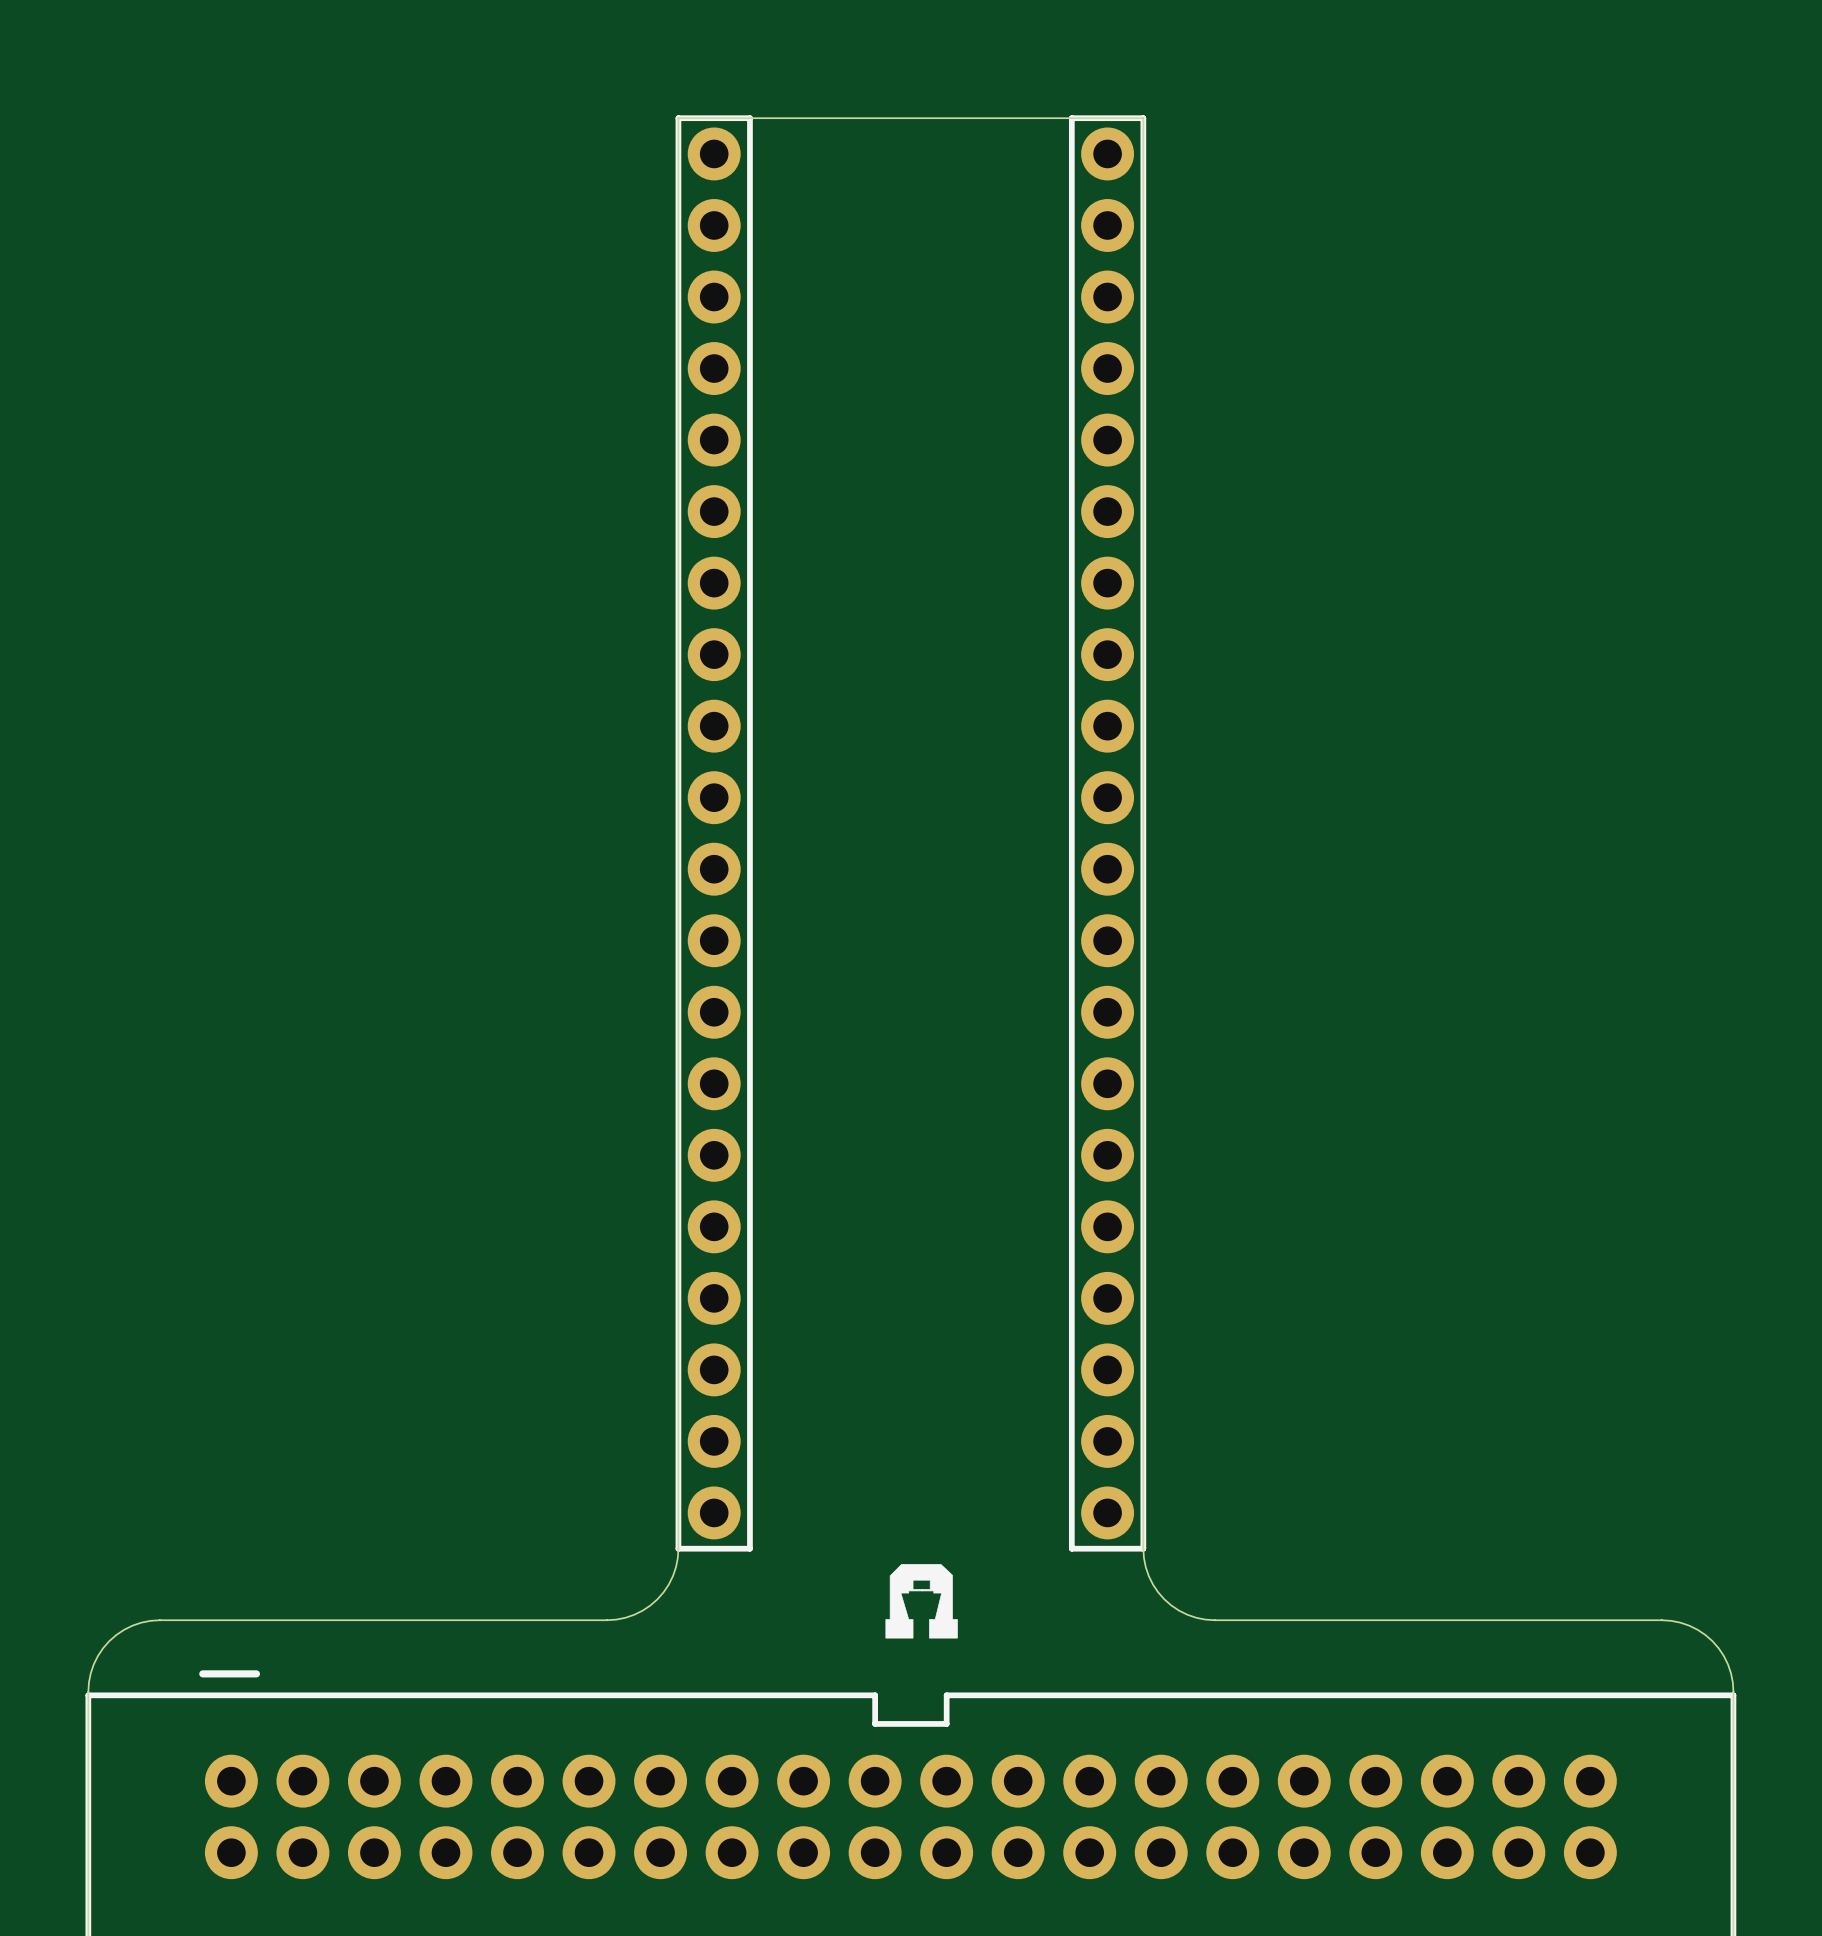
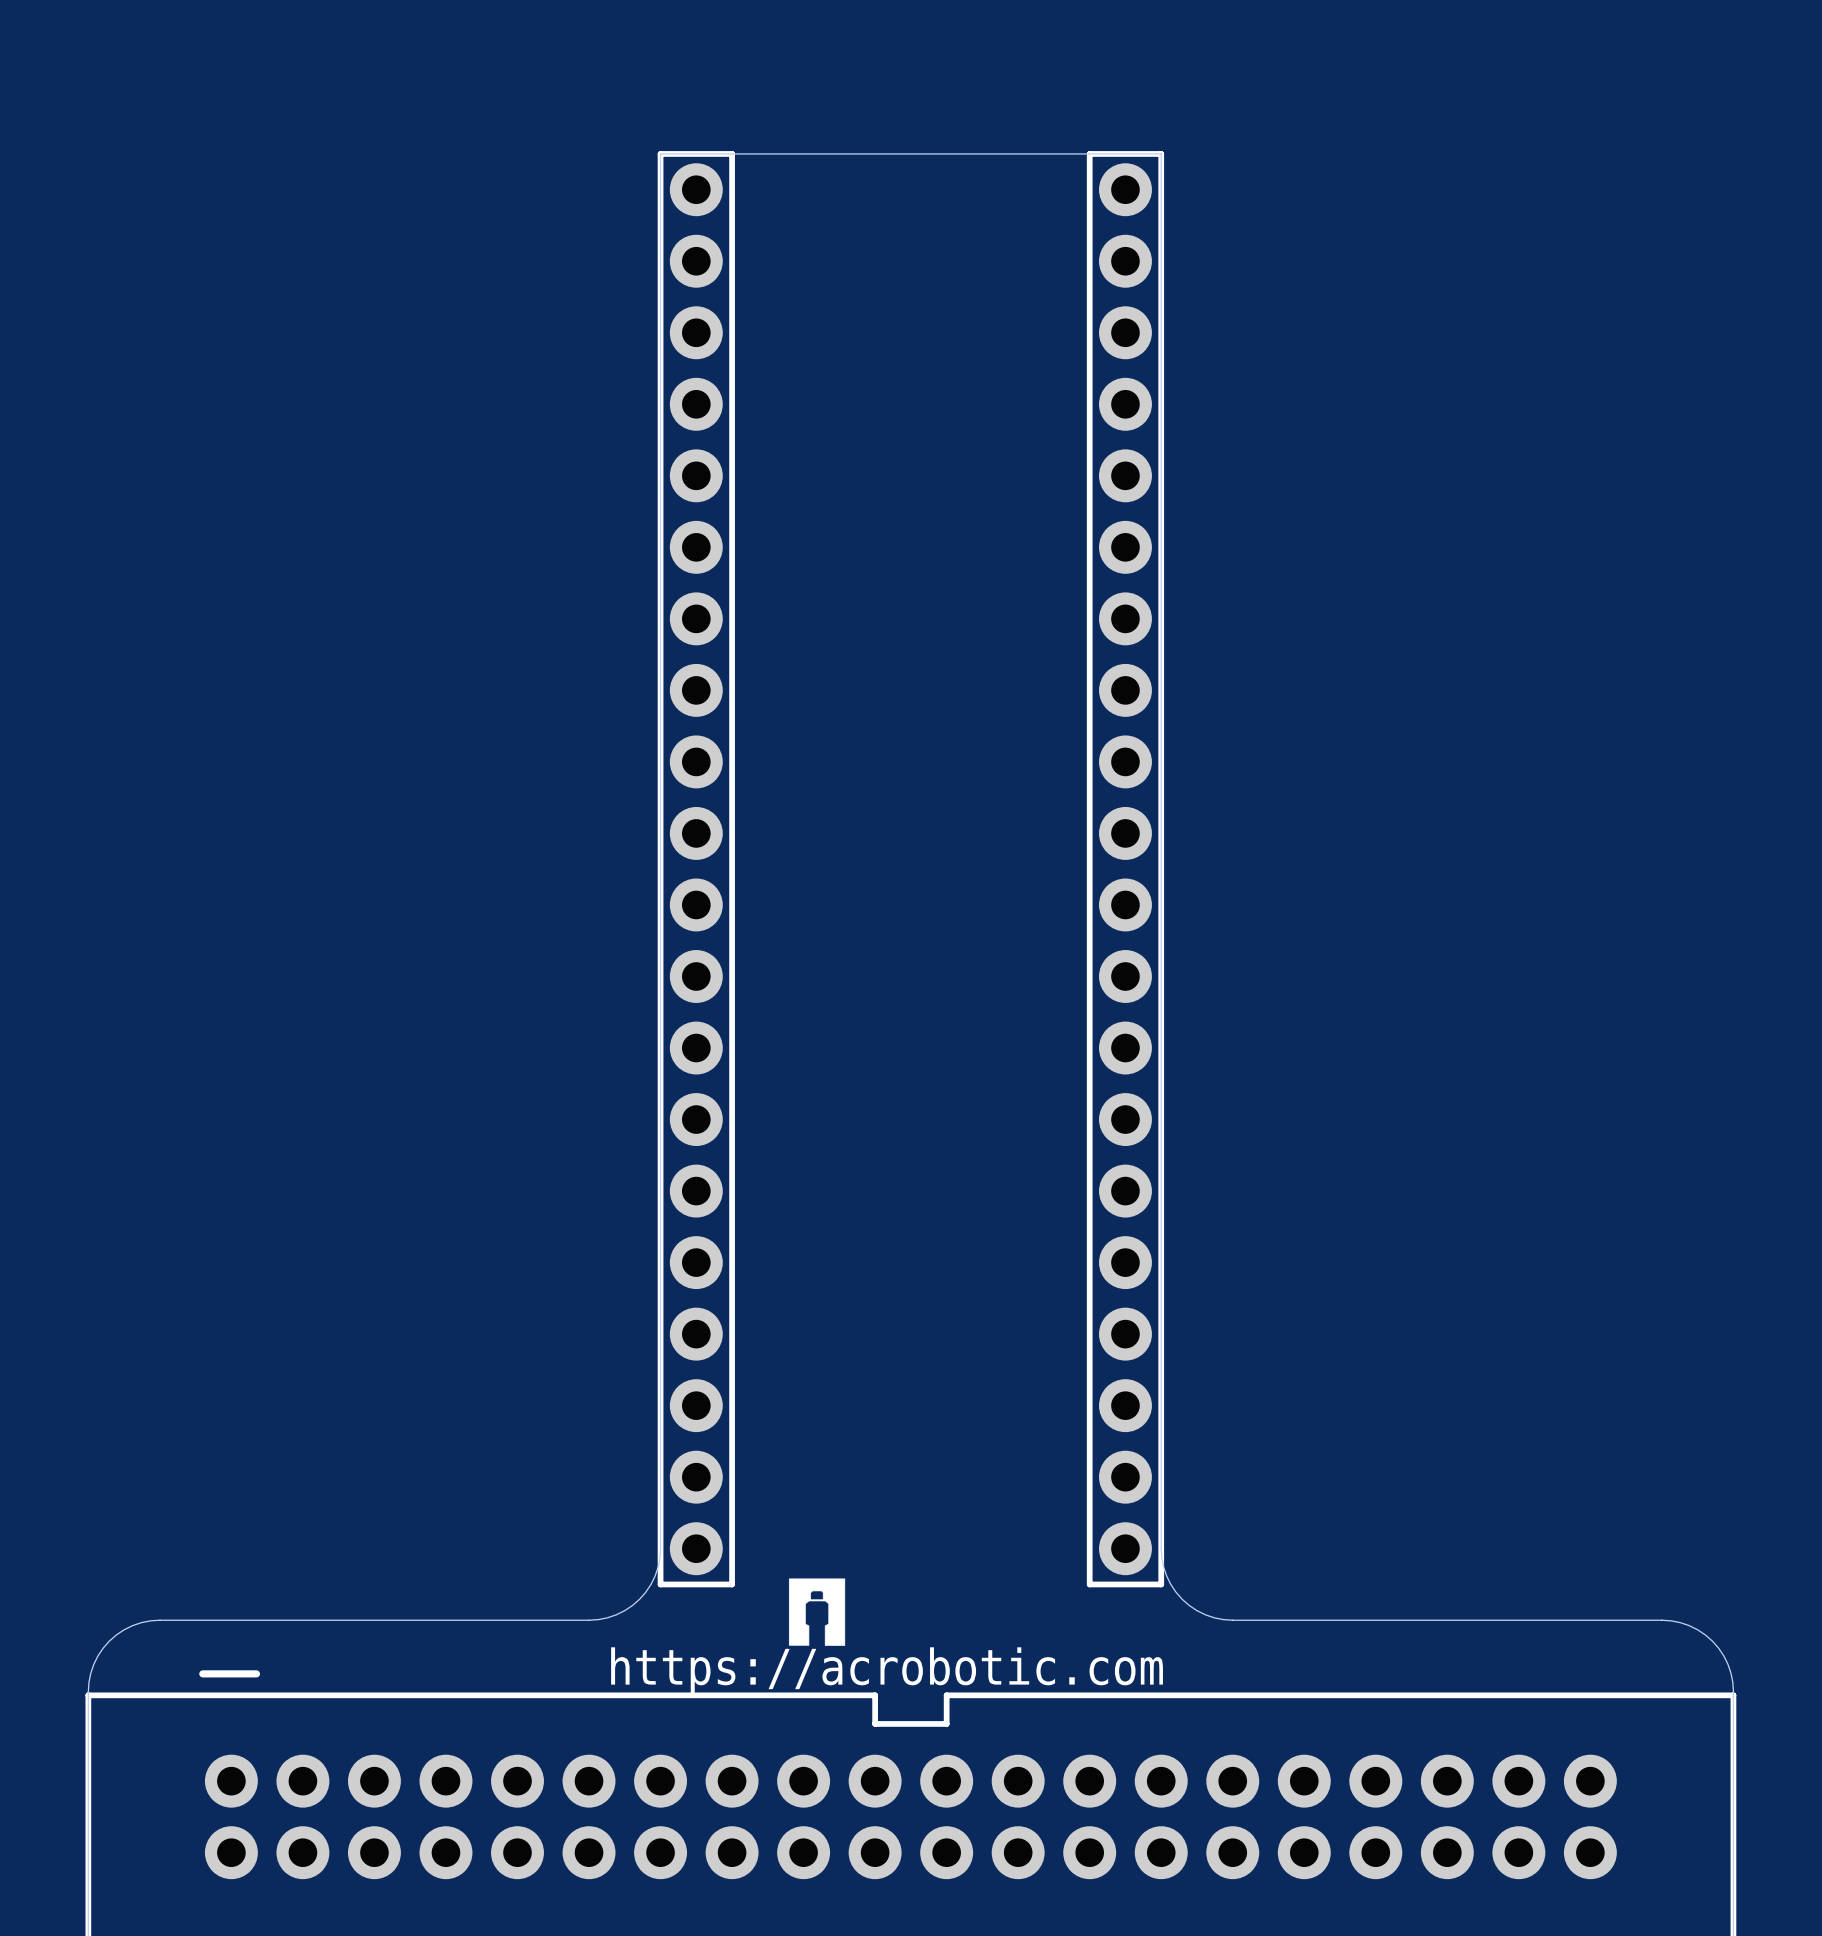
part position: (714, 833) -> (696, 869)
part position: (1107, 833) -> (1125, 869)
drawing: [885, 1564, 958, 1639] -> none
drawing: none -> [788, 1578, 846, 1646]
board edge: (1232, 1620) (1196, 1617) (1171, 1605) (1158, 1592) (1148, 1576) (1143, 1548) (1143, 118) (678, 118) (678, 1548) (672, 1576) (663, 1592) (650, 1605) (625, 1617) (589, 1620) -> (1232, 1620) (1205, 1614) (1182, 1599) (1166, 1576) (1161, 1548) (1161, 153) (660, 153) (660, 1548) (655, 1576) (639, 1599) (616, 1614) (589, 1620)
text: none -> https://acrobotic.com (887, 1671)

